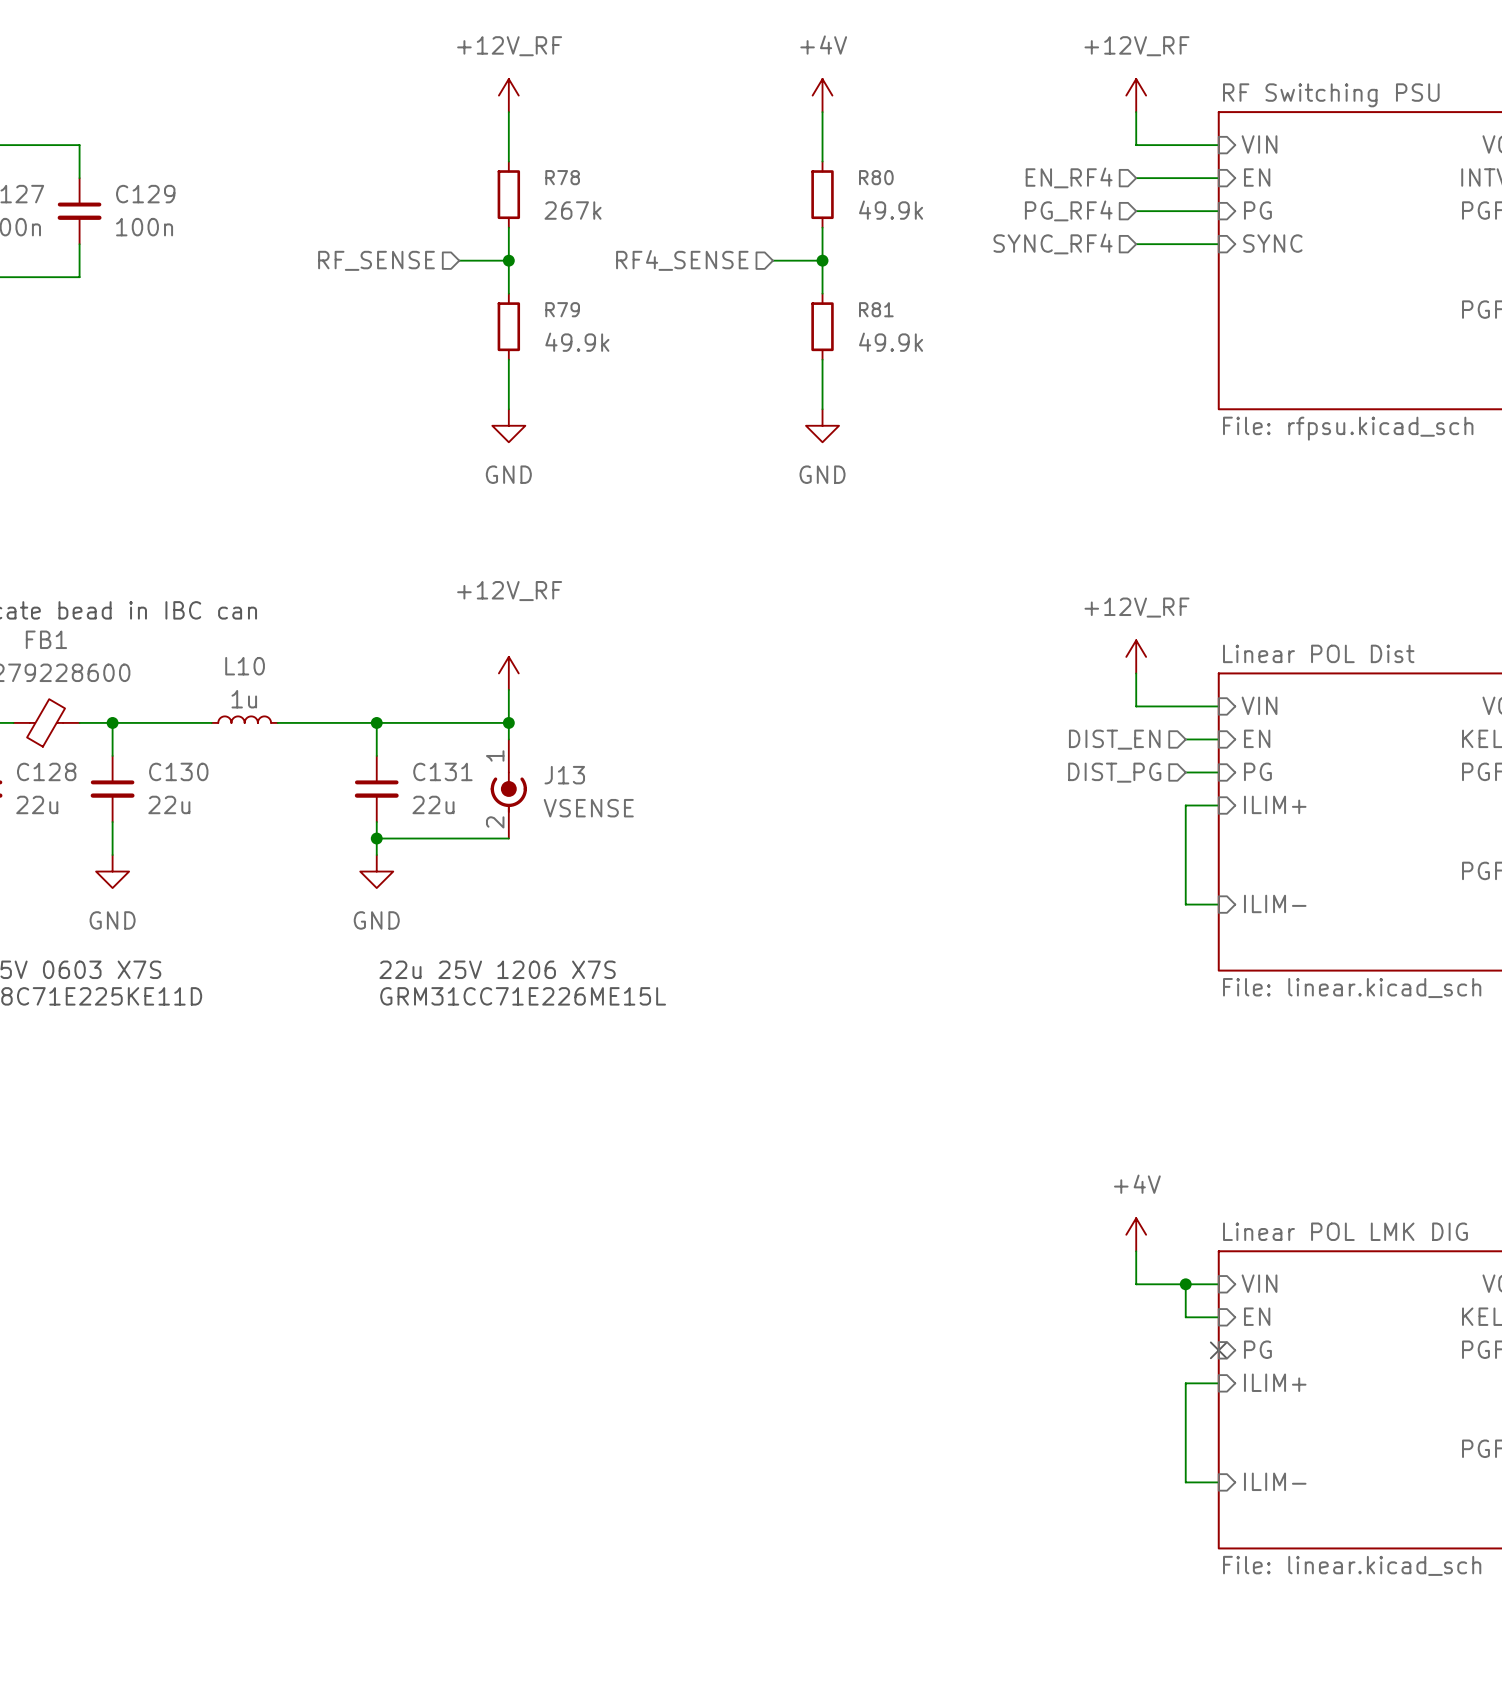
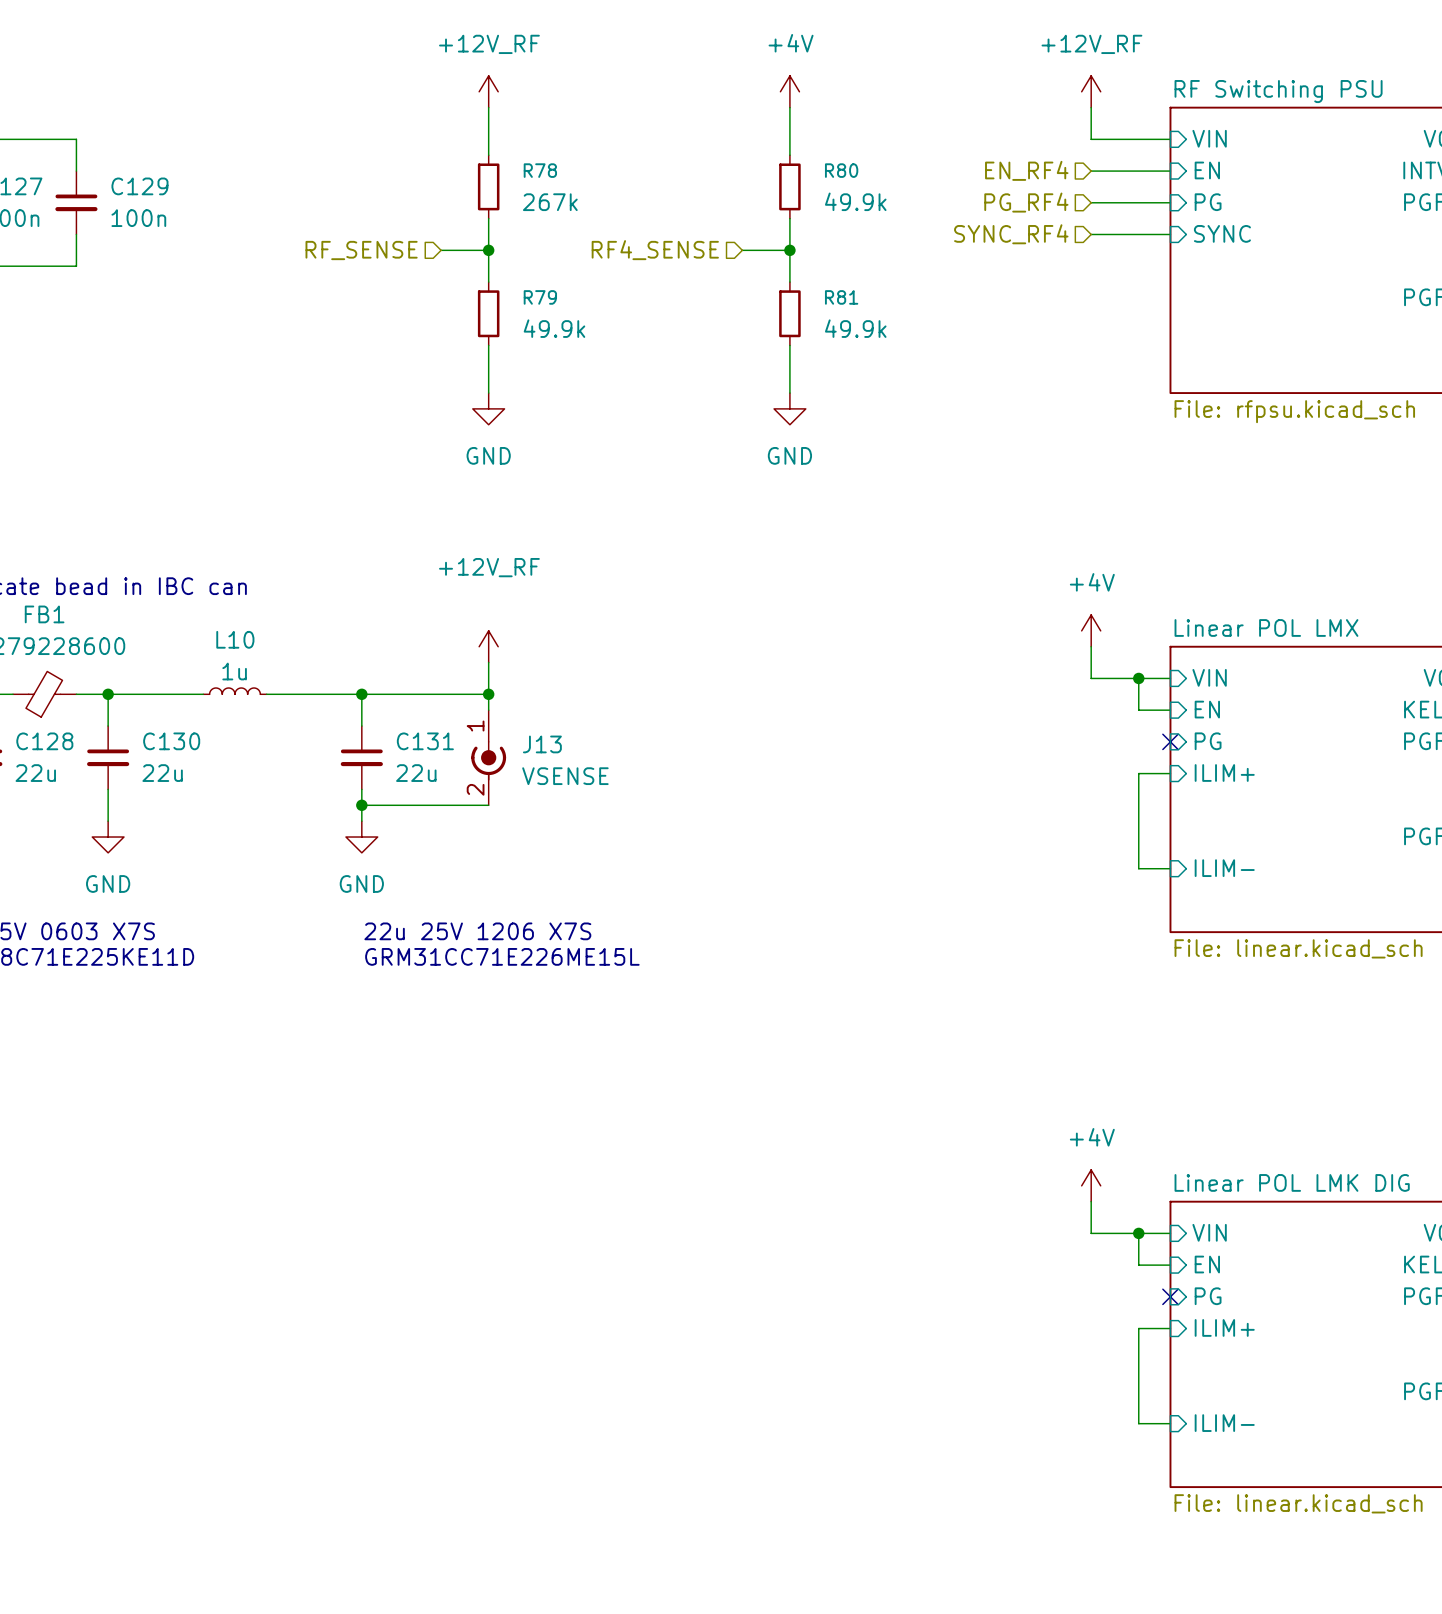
sheet Linear POL Dist name: Linear POL Dist (1318, 653) -> Linear POL LMX (1266, 627)
power symbol: +12V_RF (1136, 656) -> +4V (1091, 630)
wire: none -> (1138, 678) (1138, 710)
junction: none -> (1138, 678)
hierarchical label: DIST_EN (1114, 739) -> none
hierarchical label: DIST_PG (1114, 772) -> none
wire: (1185, 772) (1218, 772) -> none
no-connect mark: none -> (1170, 741)

